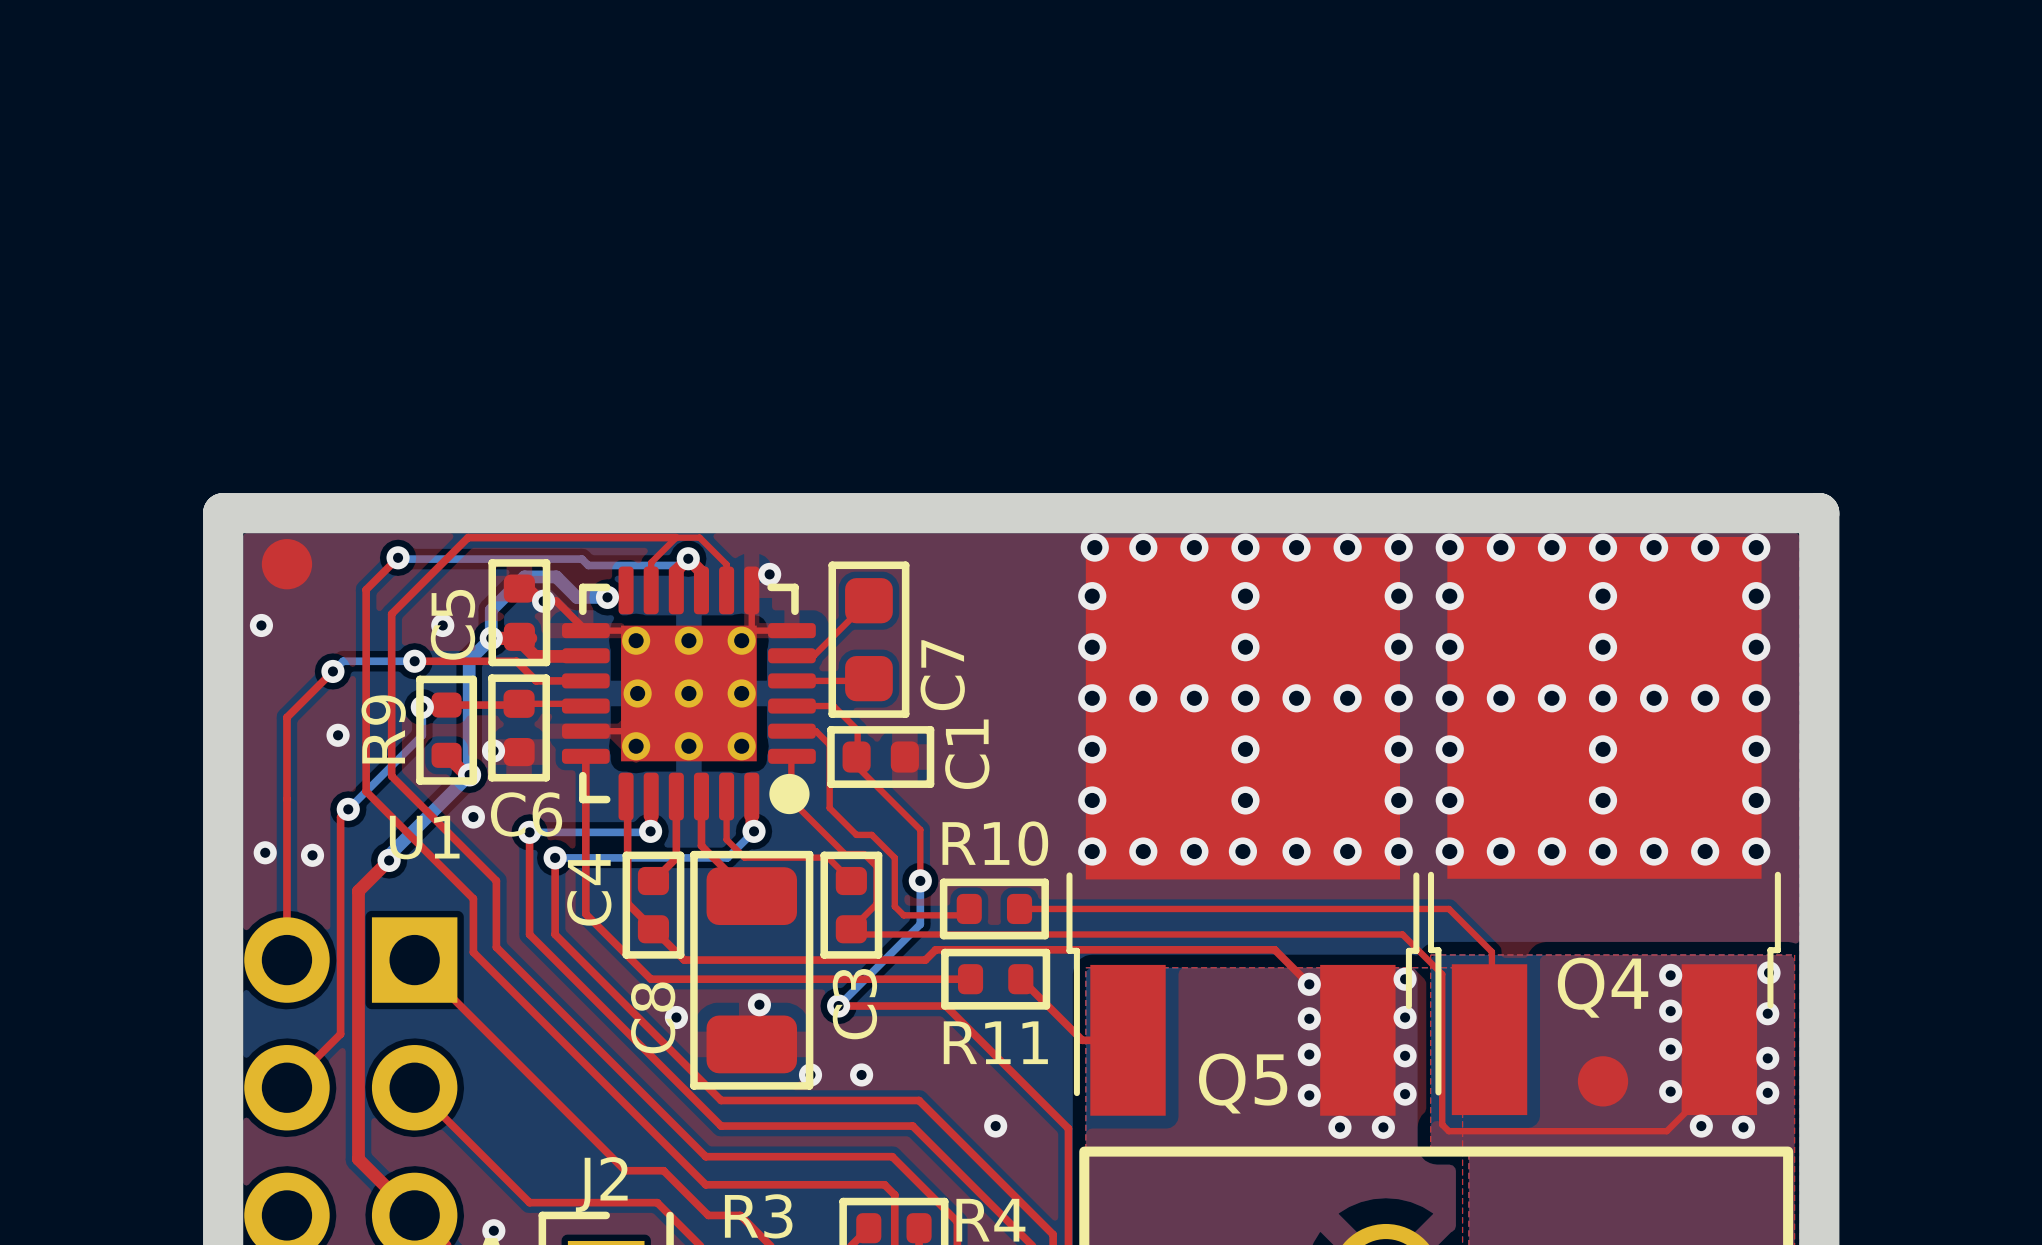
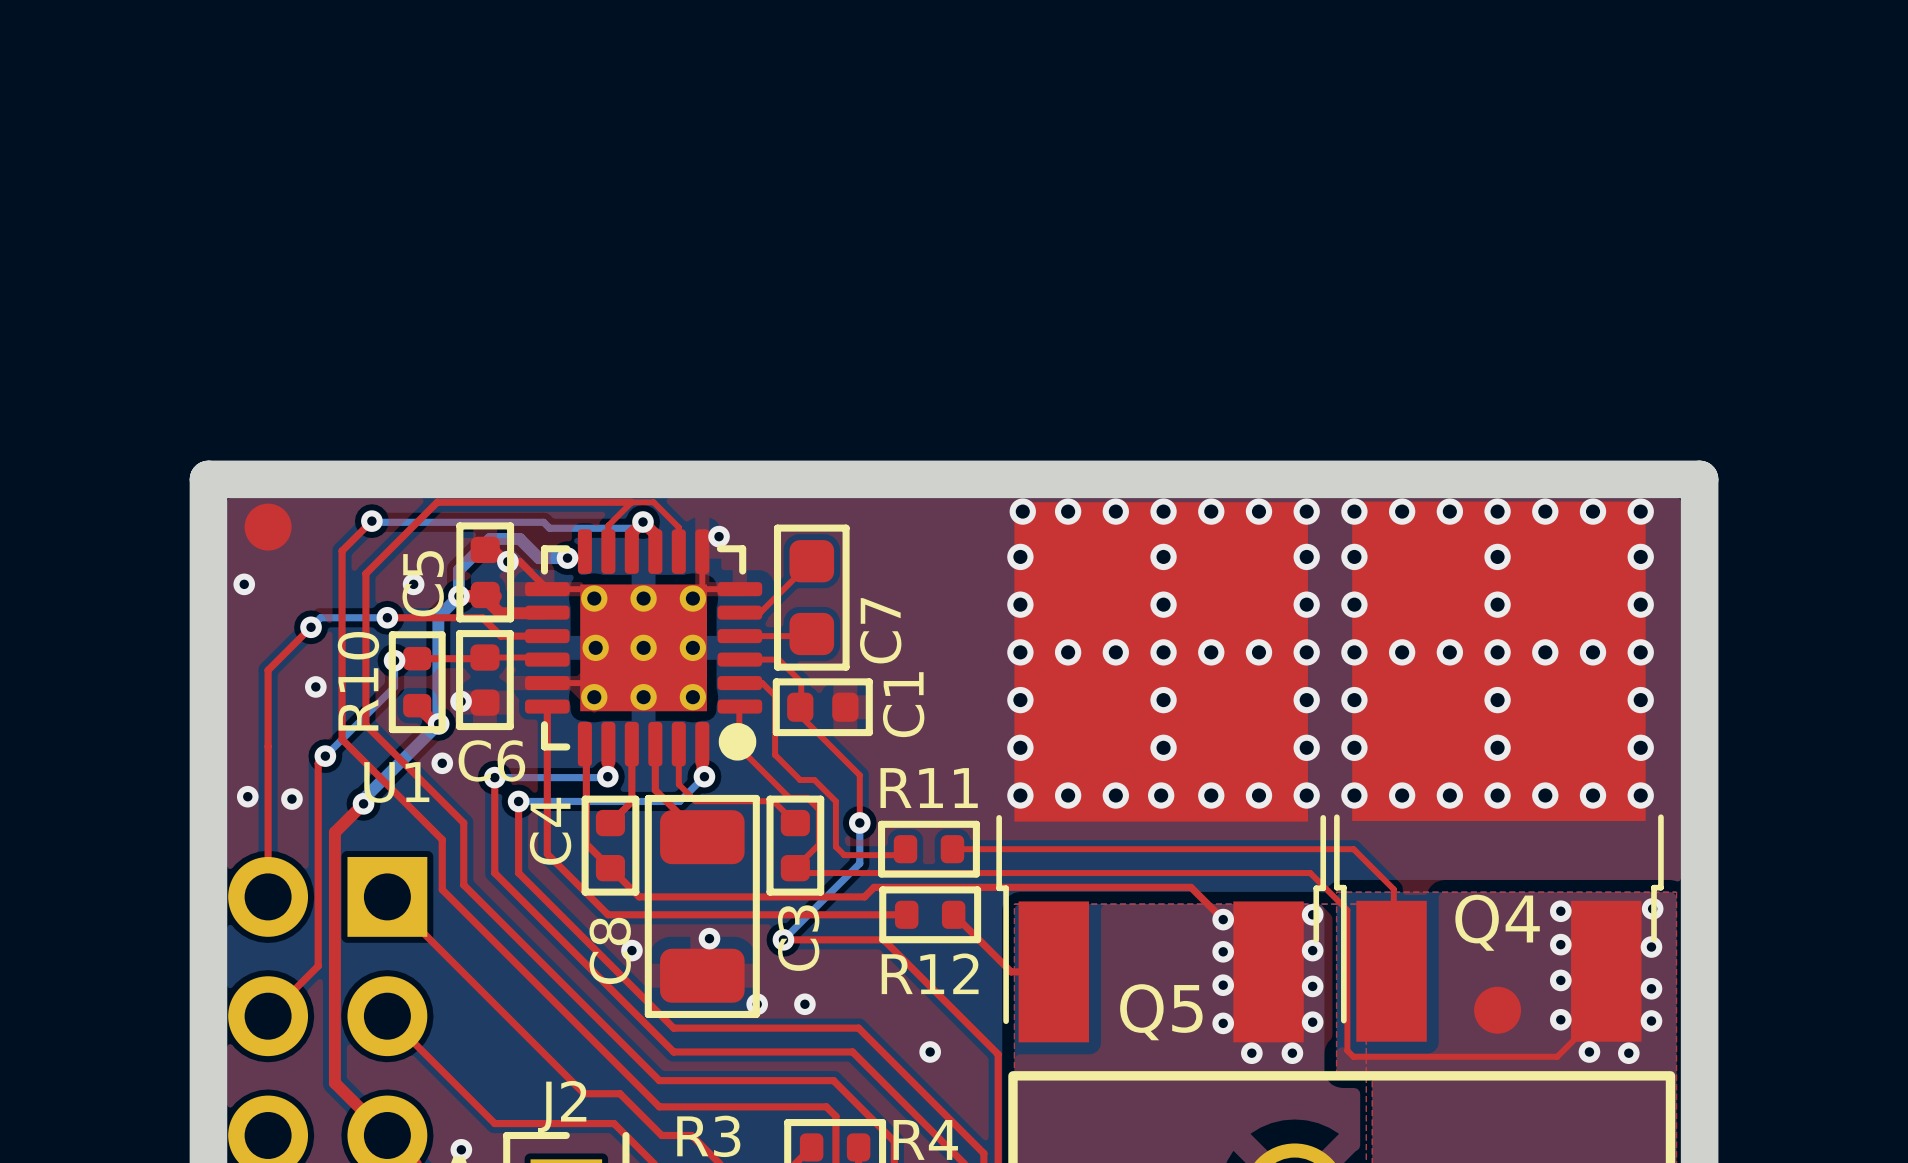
R9 name: R9 (383, 729) -> R10 (358, 681)
R10 name: R10 (995, 843) -> R11 (929, 788)
R11 name: R11 (995, 1042) -> R12 (930, 973)

